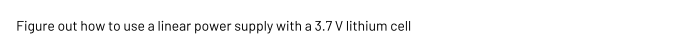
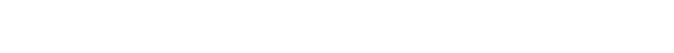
text: Figure out how to use a linear power supply with a 3.7 V lithium cell (213, 27) -> none

